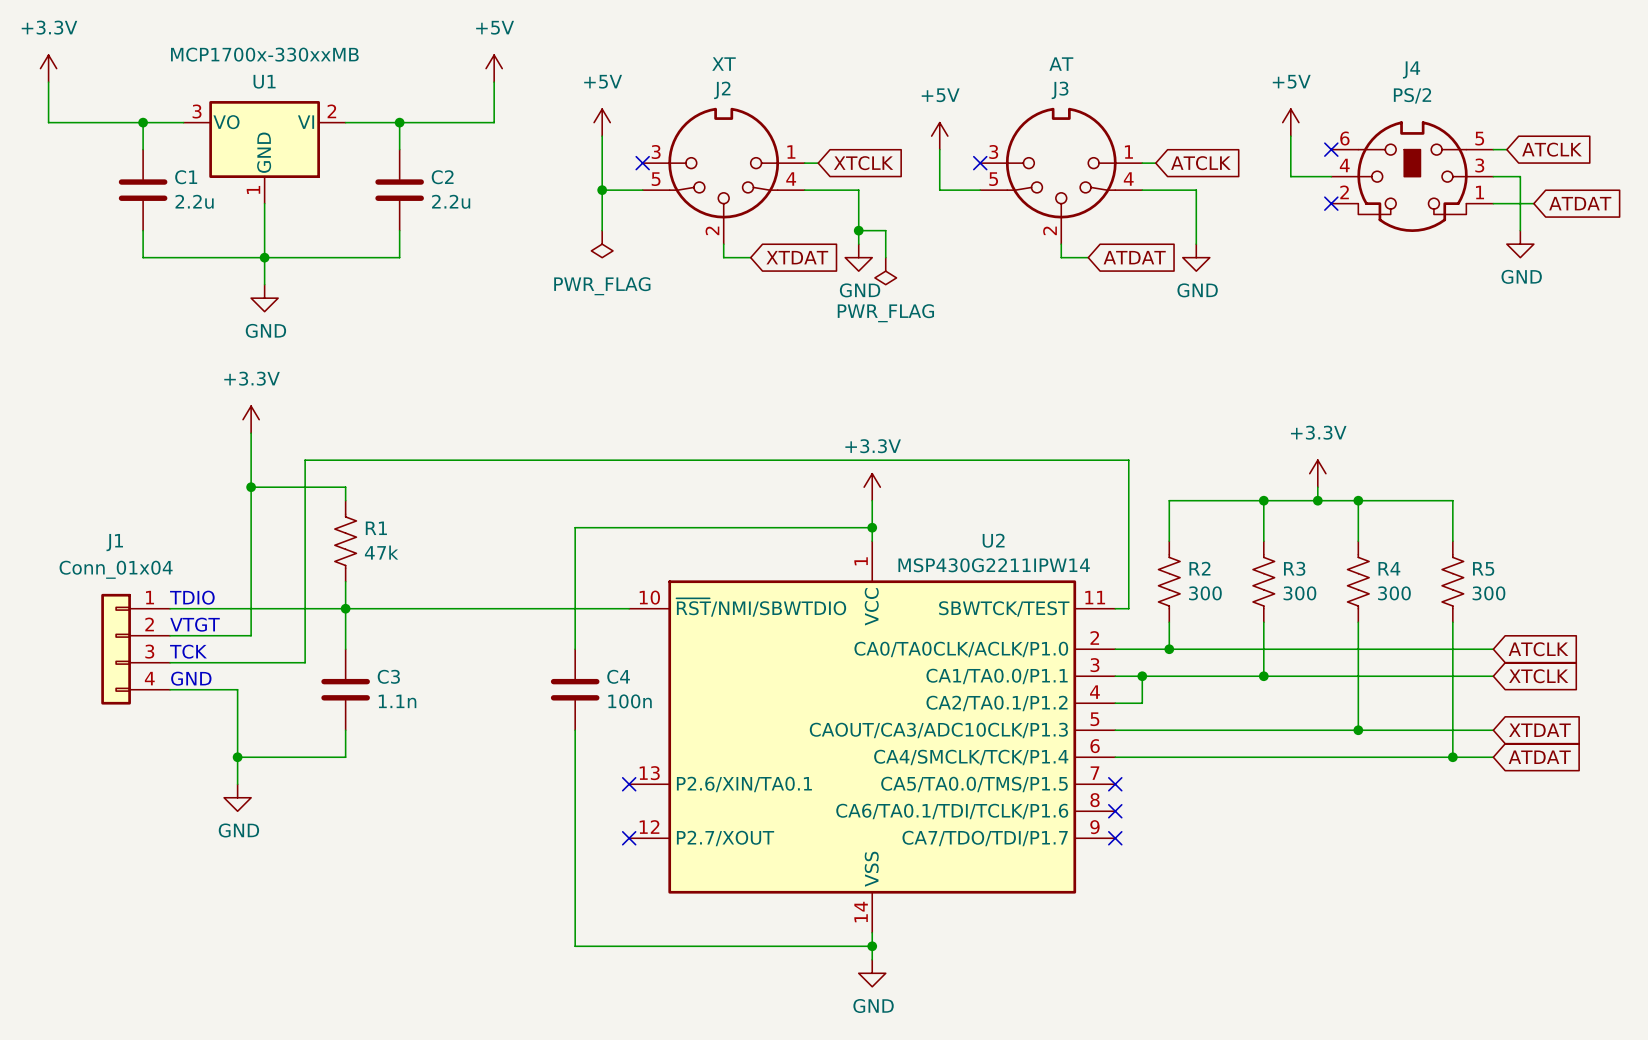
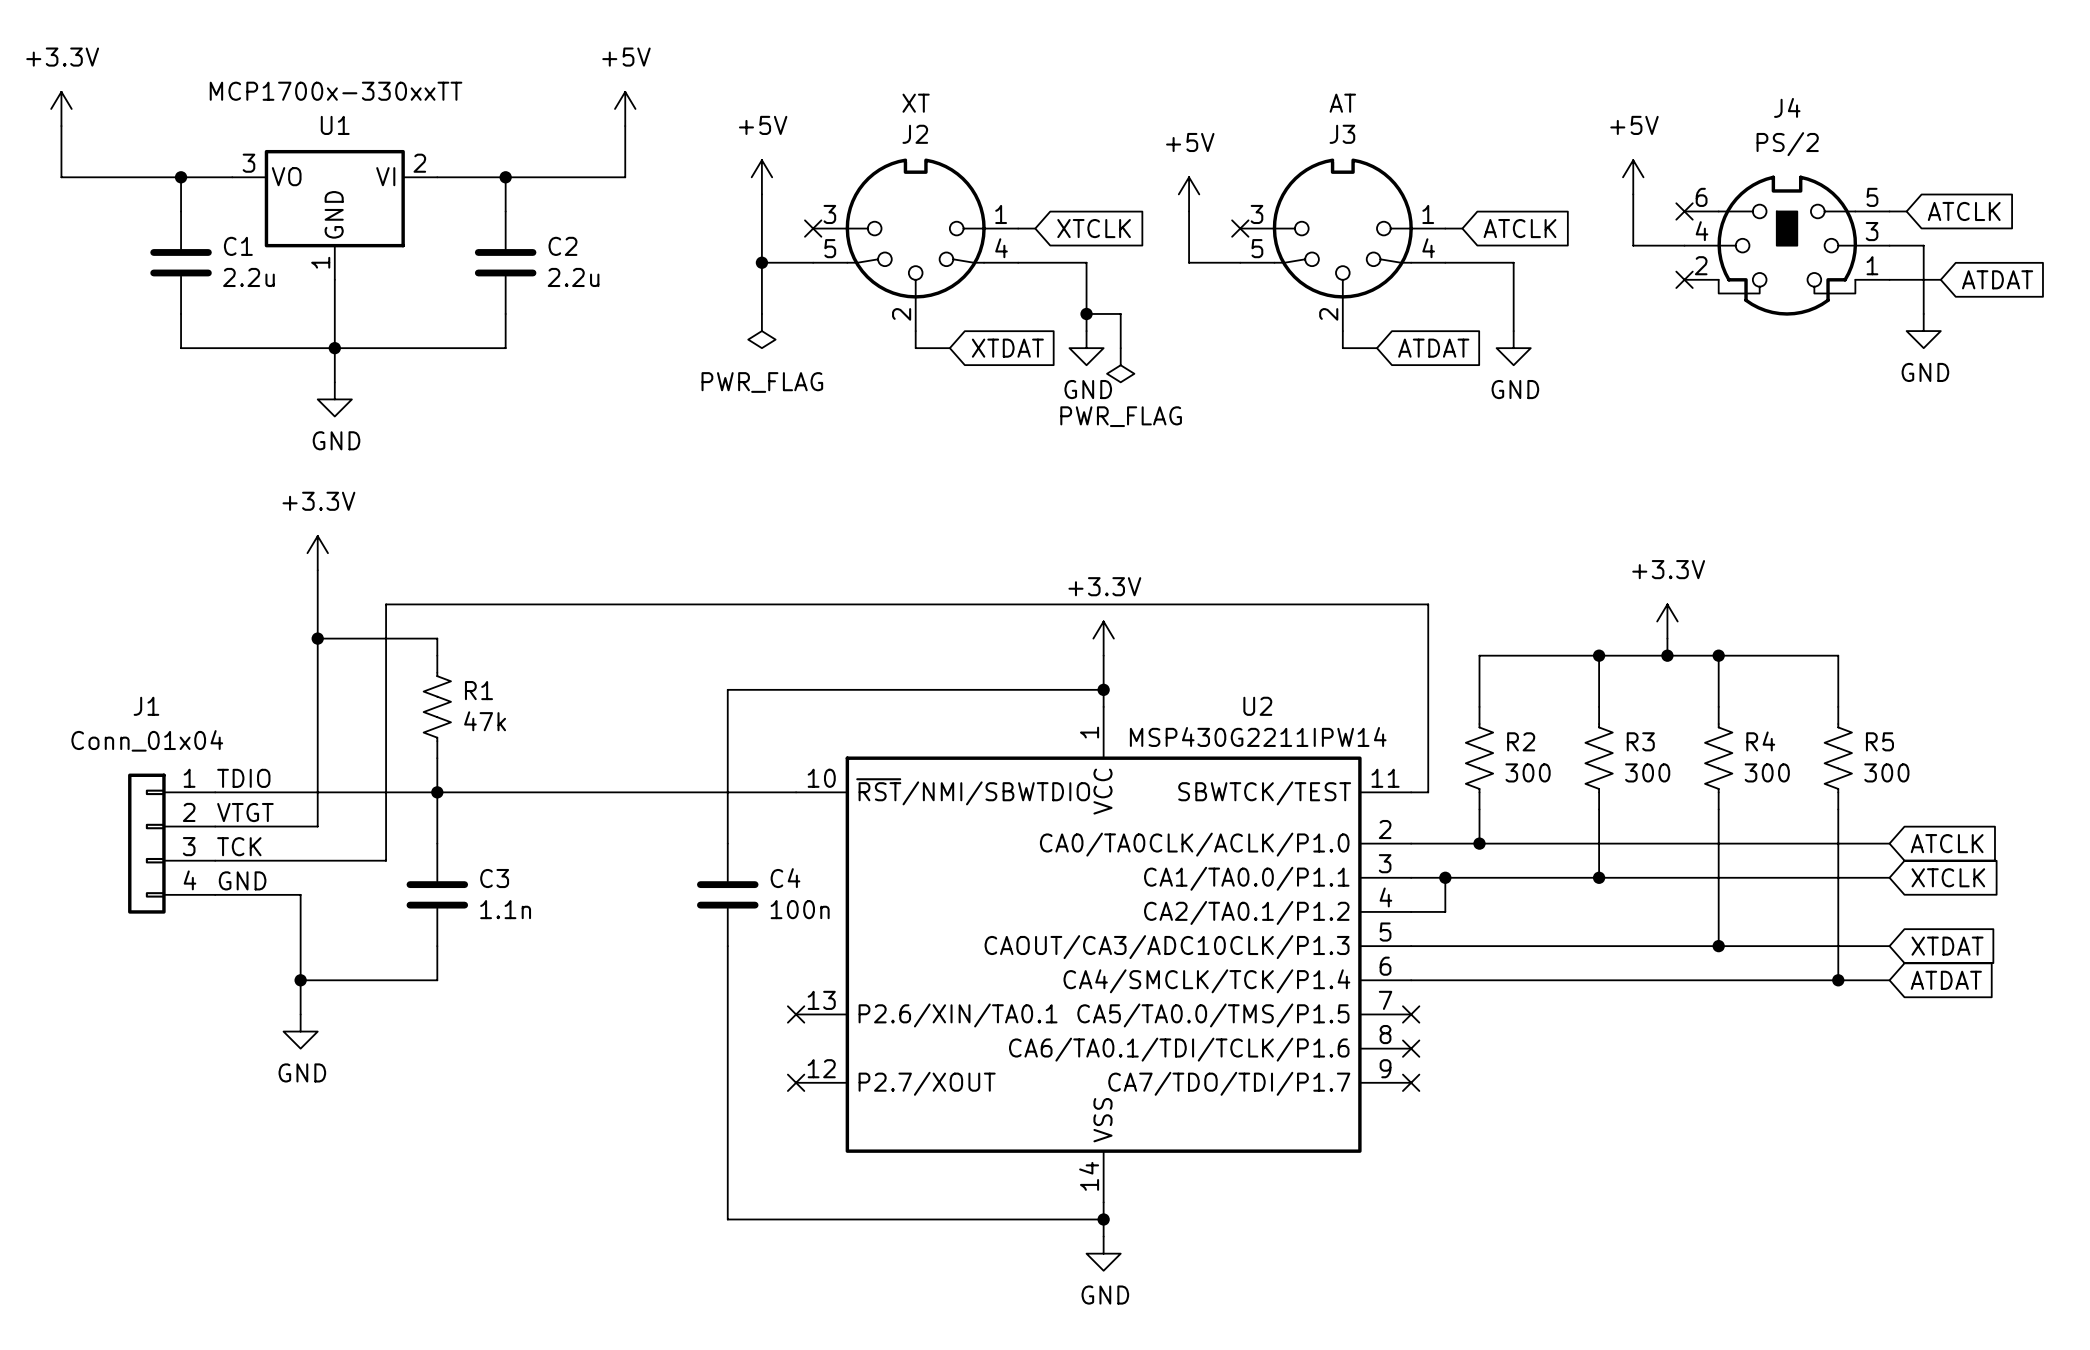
U1 value: MCP1700x-330xxMB (264, 54) -> MCP1700x-330xxTT (336, 91)

